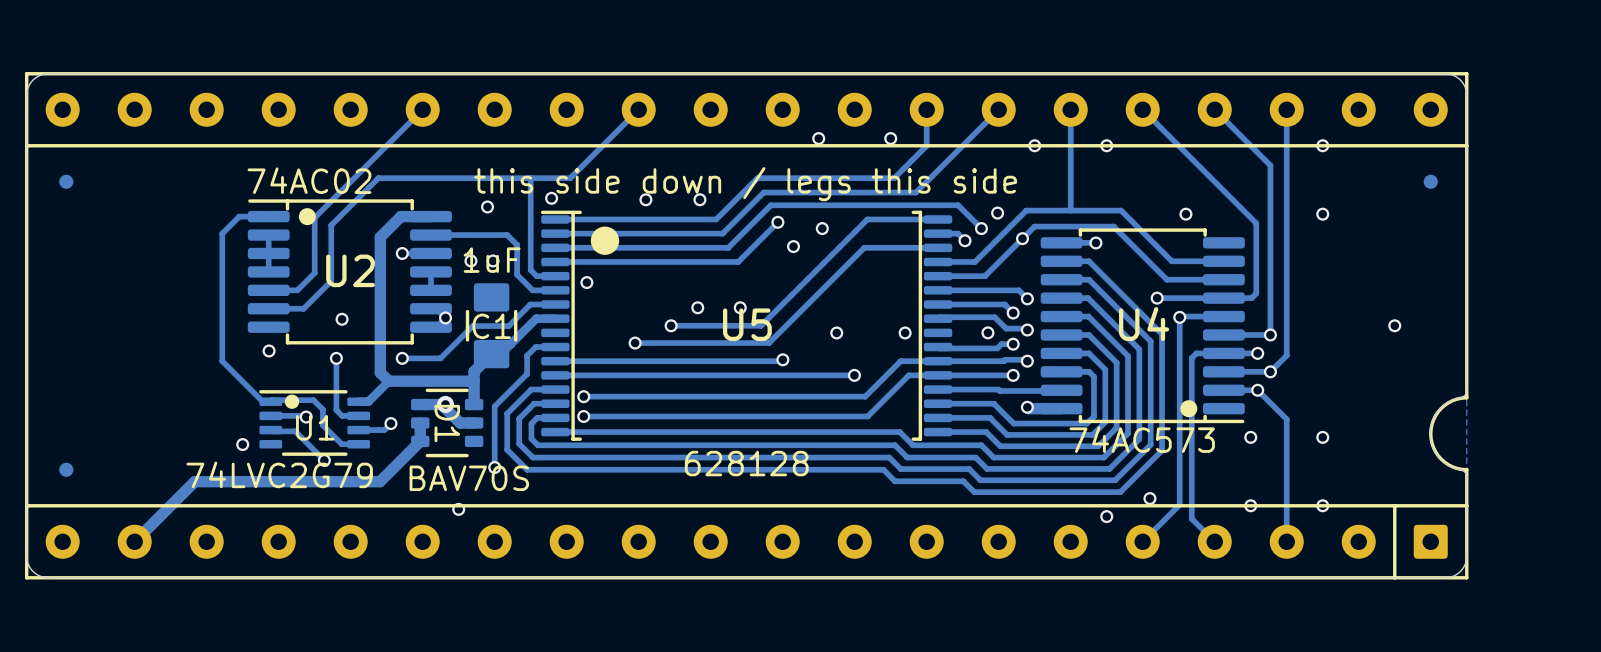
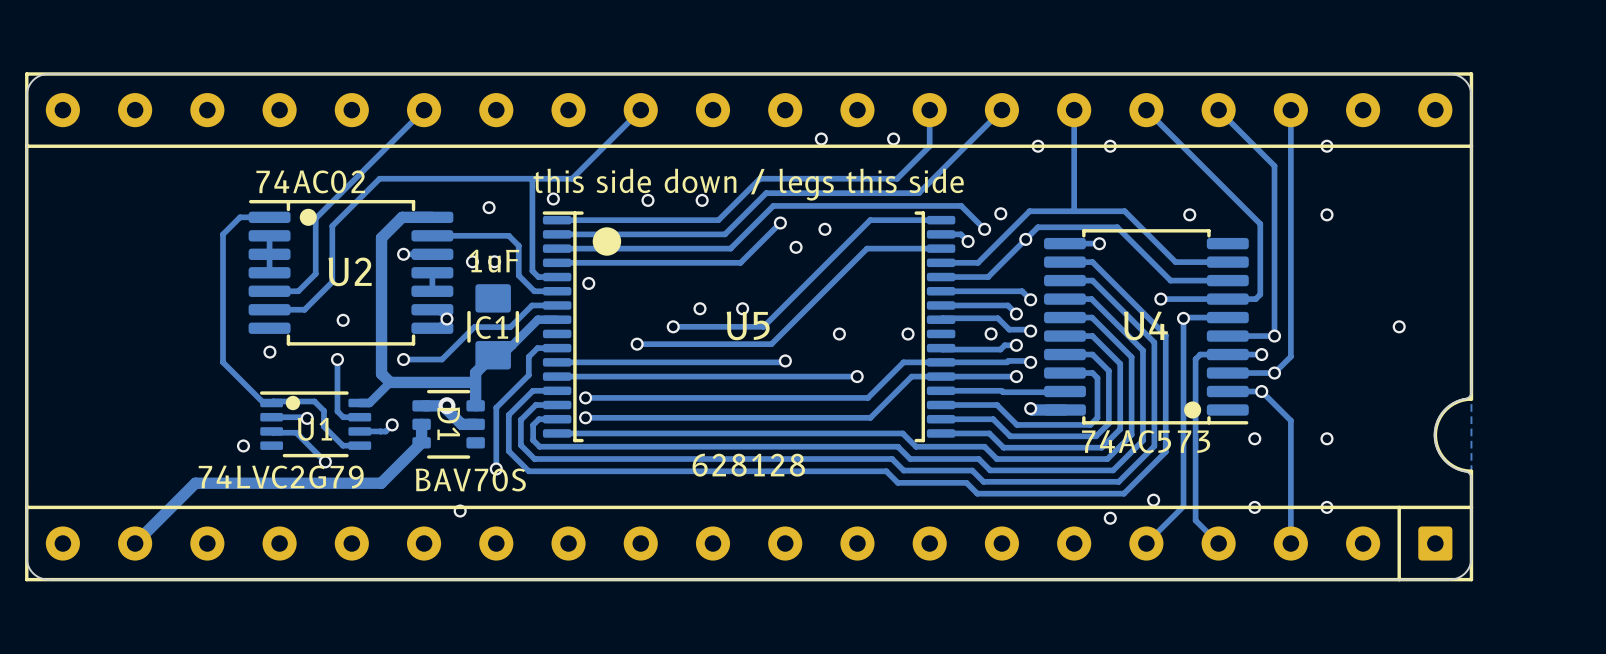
part: (66, 181) -> none
part: (1430, 181) -> none
part: (66, 469) -> none

